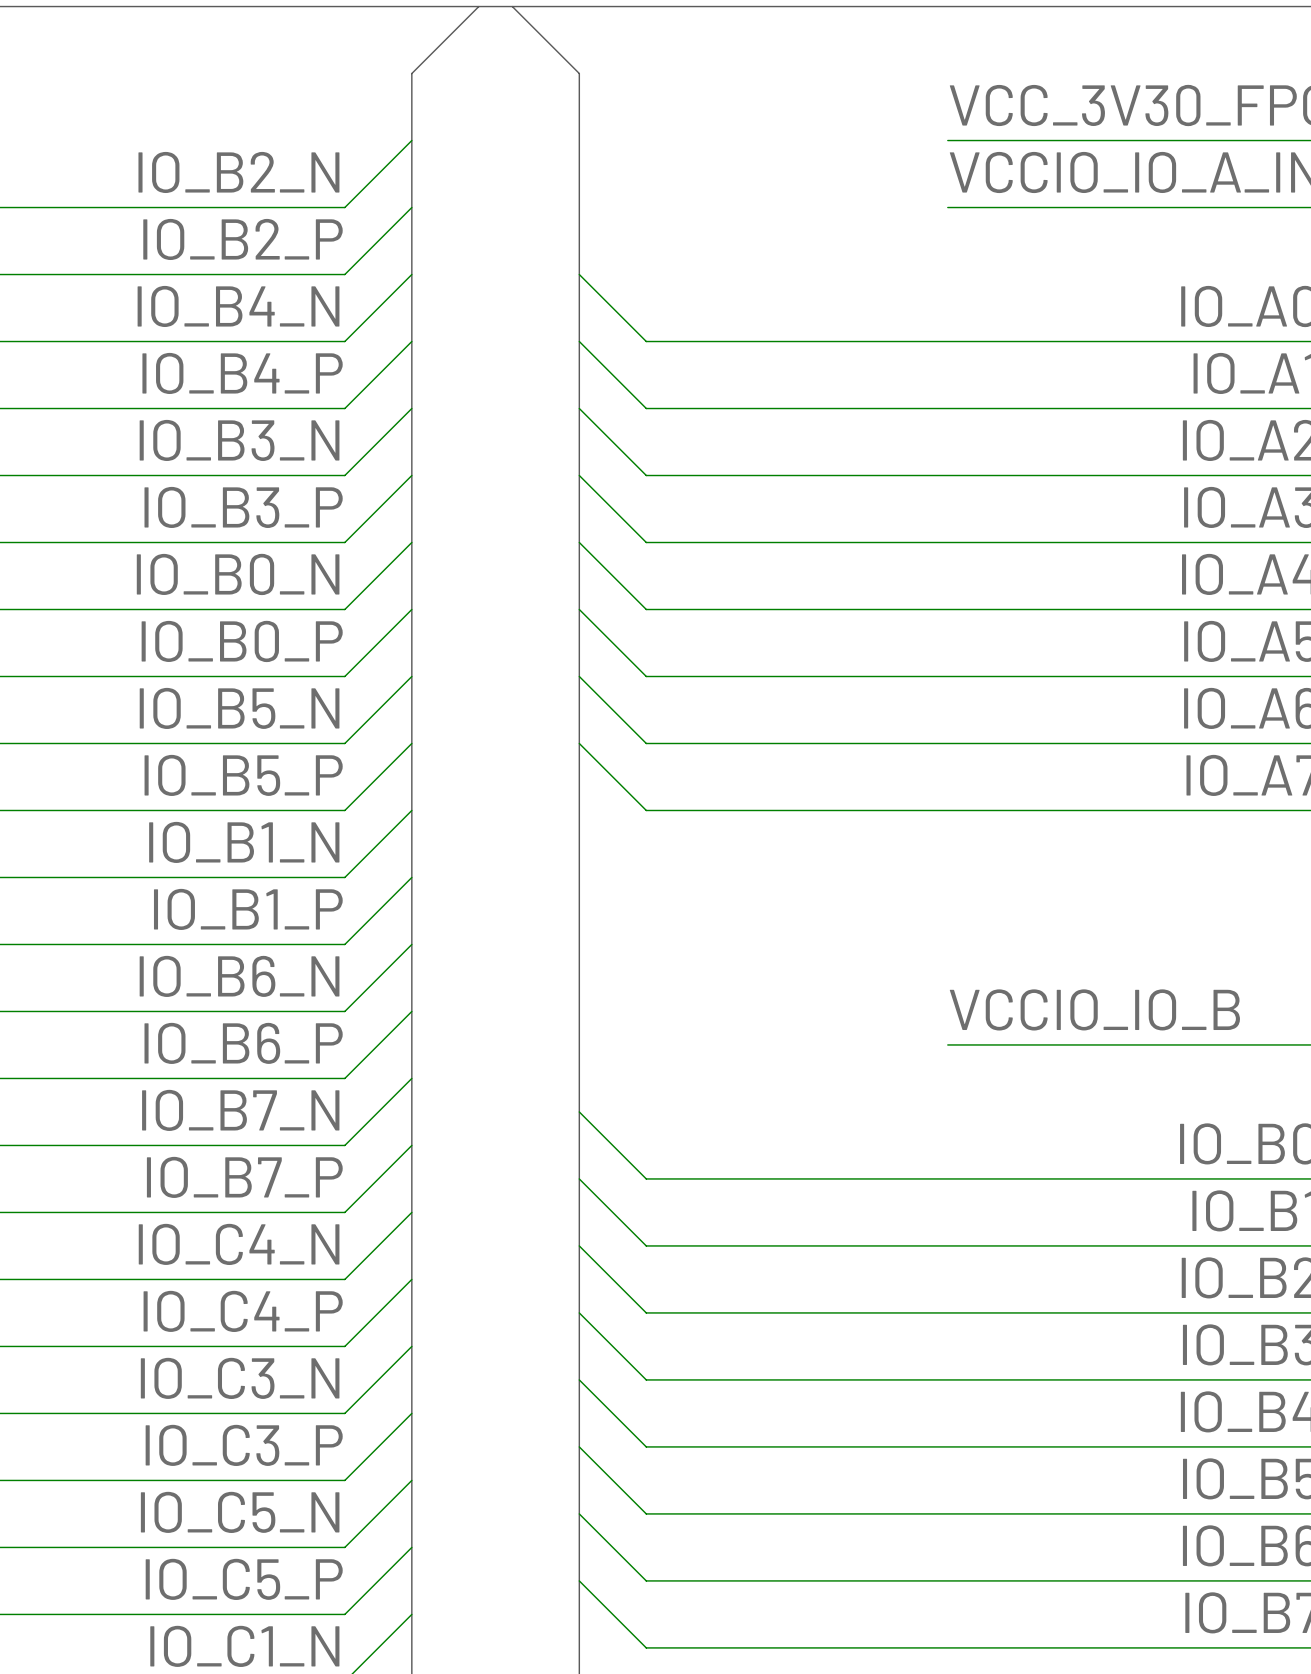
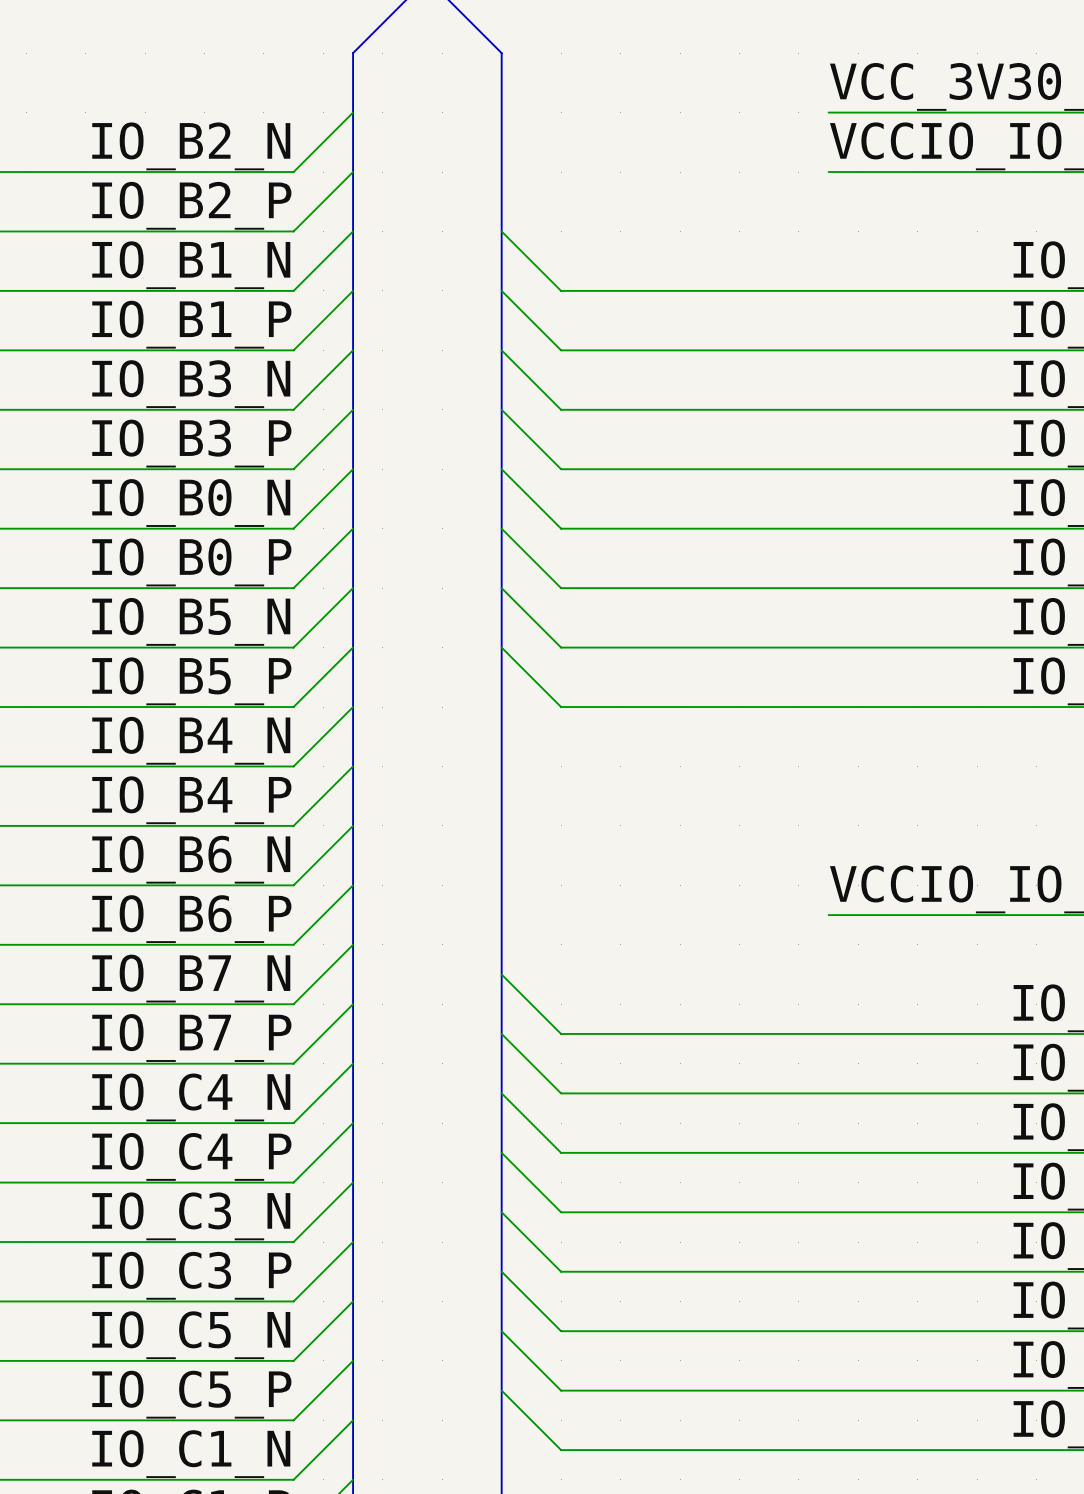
label: IO_B4_N (238, 306) -> IO_B1_N (191, 265)
label: IO_B4_P (242, 373) -> IO_B1_P (191, 324)
label: IO_B1_N (244, 842) -> IO_B4_N (191, 740)
label: IO_B1_P (248, 909) -> IO_B4_P (191, 800)

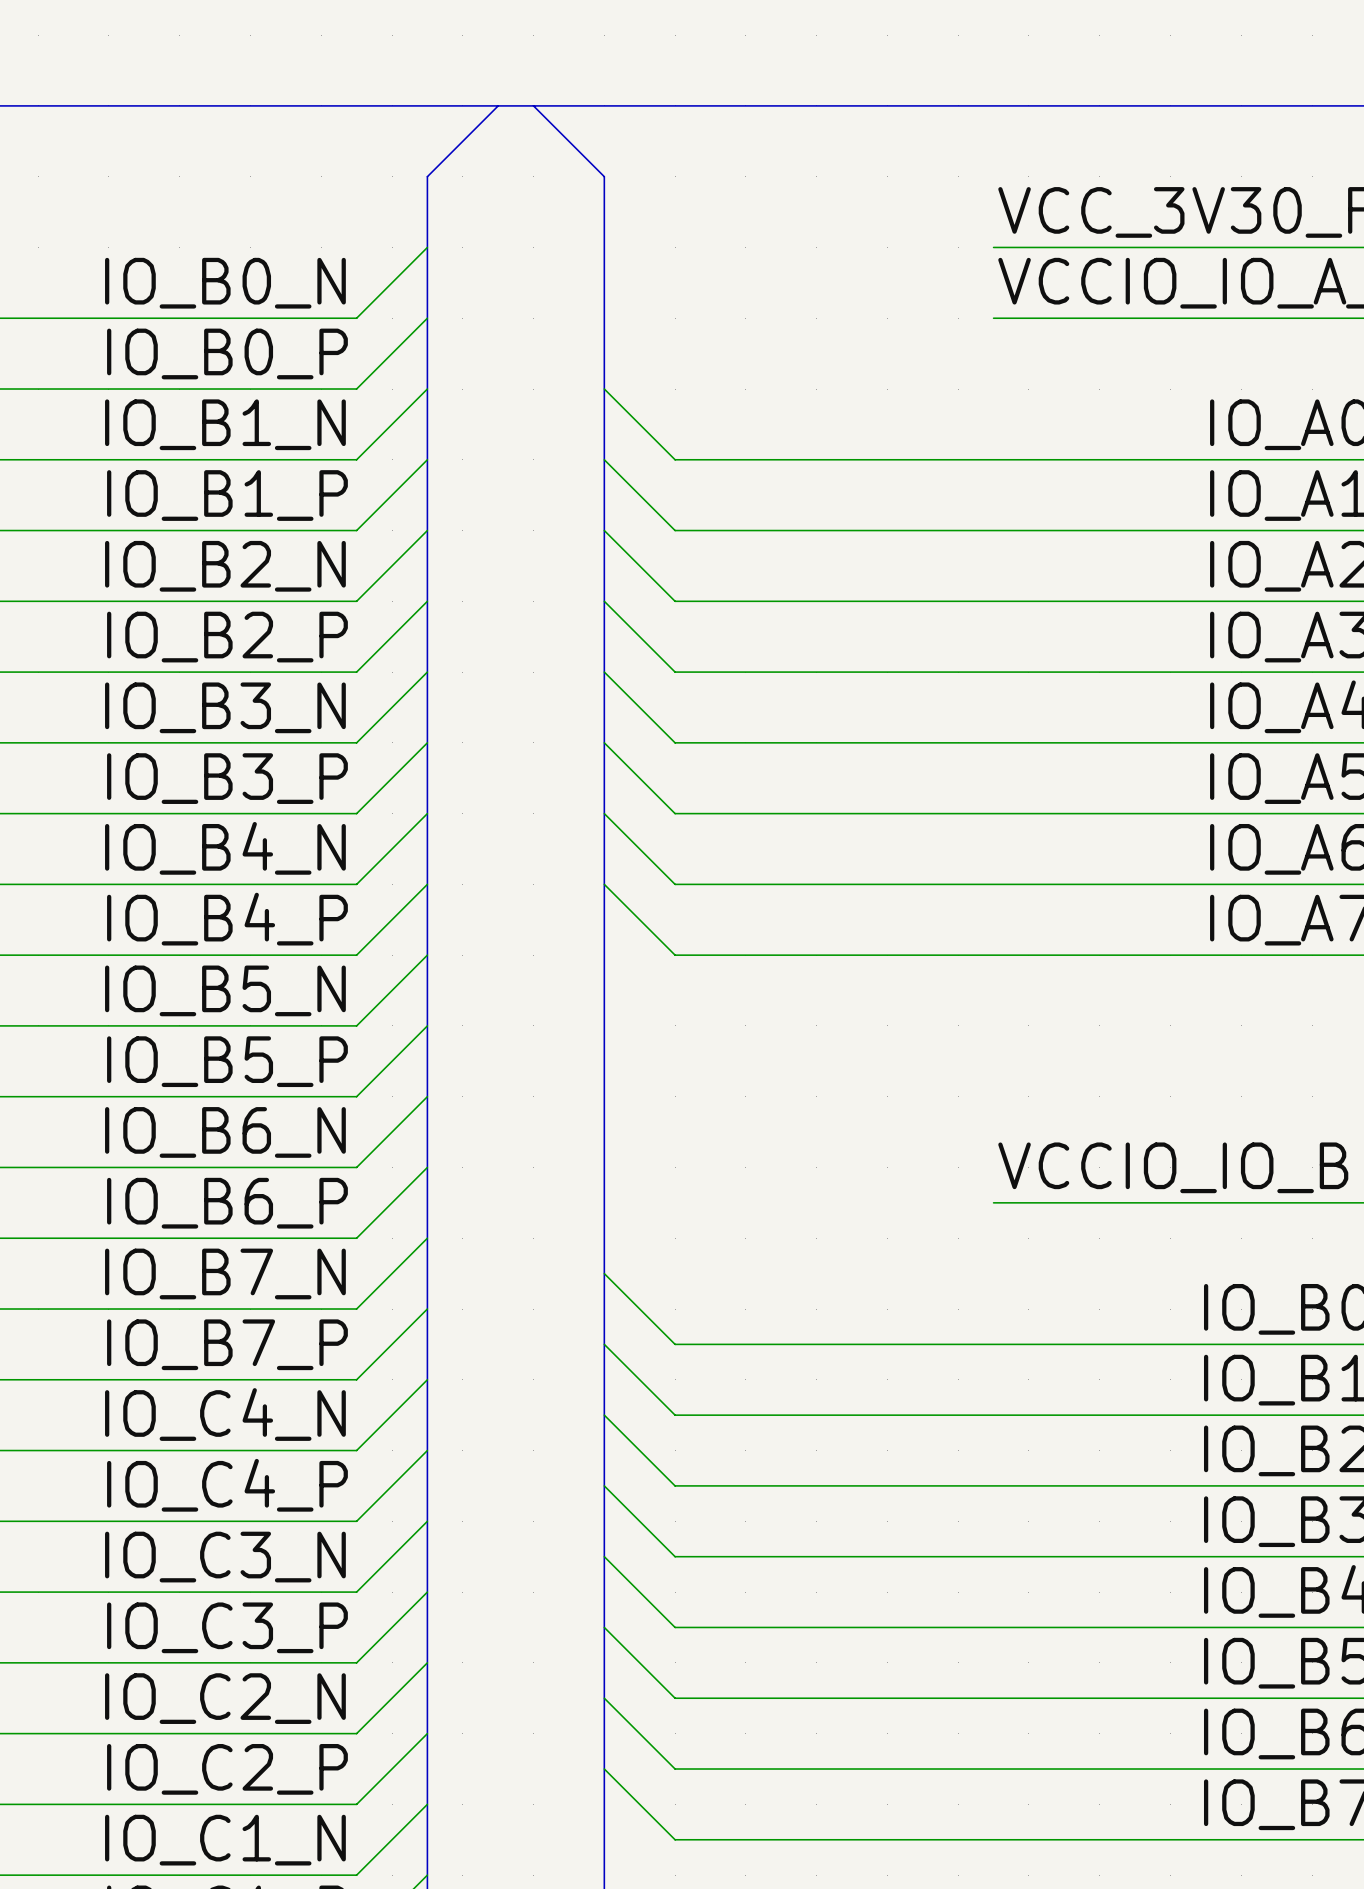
label: IO_B2_N (191, 146) -> IO_B0_N (225, 283)
label: IO_B2_P (191, 205) -> IO_B0_P (227, 353)
label: IO_B3_N (191, 384) -> IO_B2_N (225, 566)
label: IO_B3_P (191, 443) -> IO_B2_P (227, 637)
label: IO_B0_N (191, 503) -> IO_B3_N (225, 707)
label: IO_B0_P (191, 562) -> IO_B3_P (227, 778)
label: IO_B5_N (191, 621) -> IO_B4_N (225, 848)
label: IO_B5_P (191, 681) -> IO_B4_P (227, 919)
label: IO_B4_N (191, 740) -> IO_B5_N (225, 990)
label: IO_B4_P (191, 800) -> IO_B5_P (227, 1061)
label: IO_C5_N (191, 1335) -> IO_C2_N (225, 1698)
label: IO_C5_P (191, 1394) -> IO_C2_P (227, 1769)

